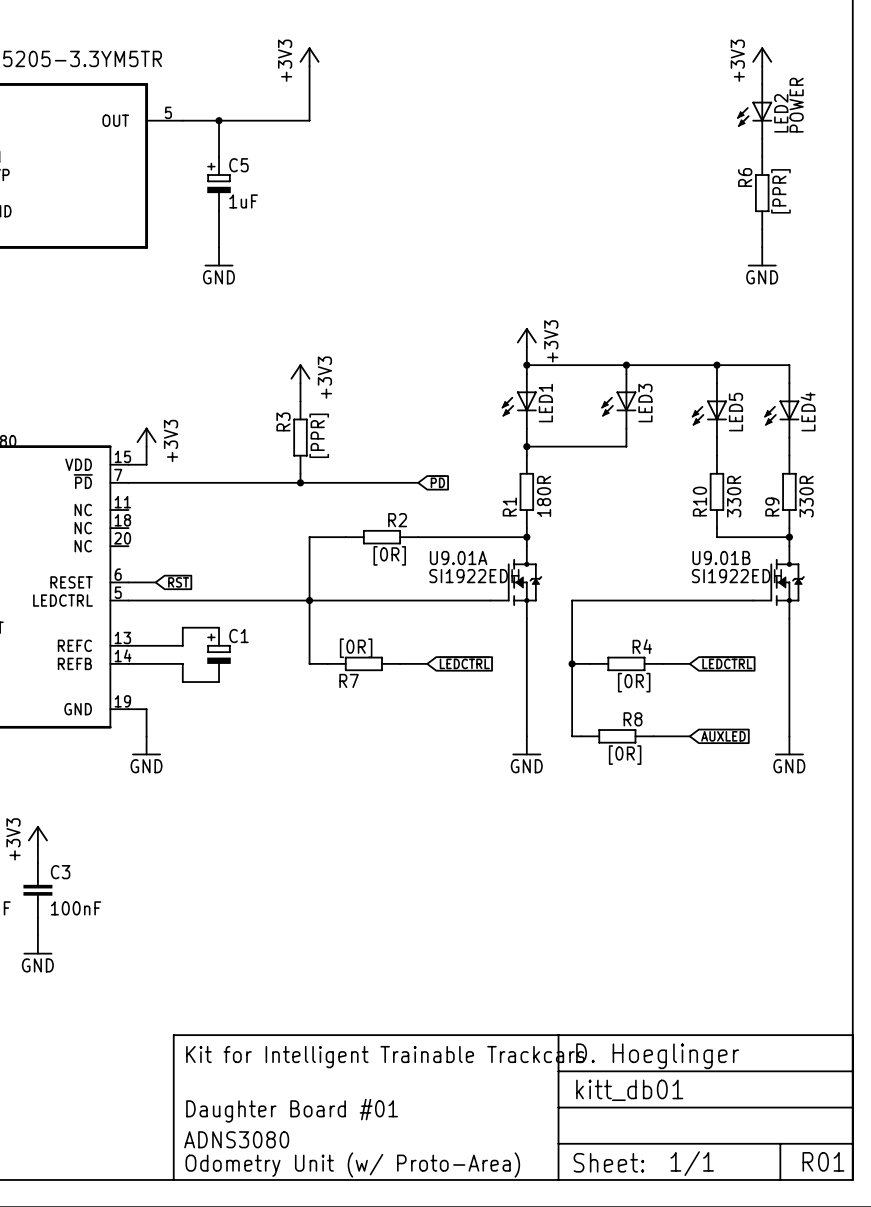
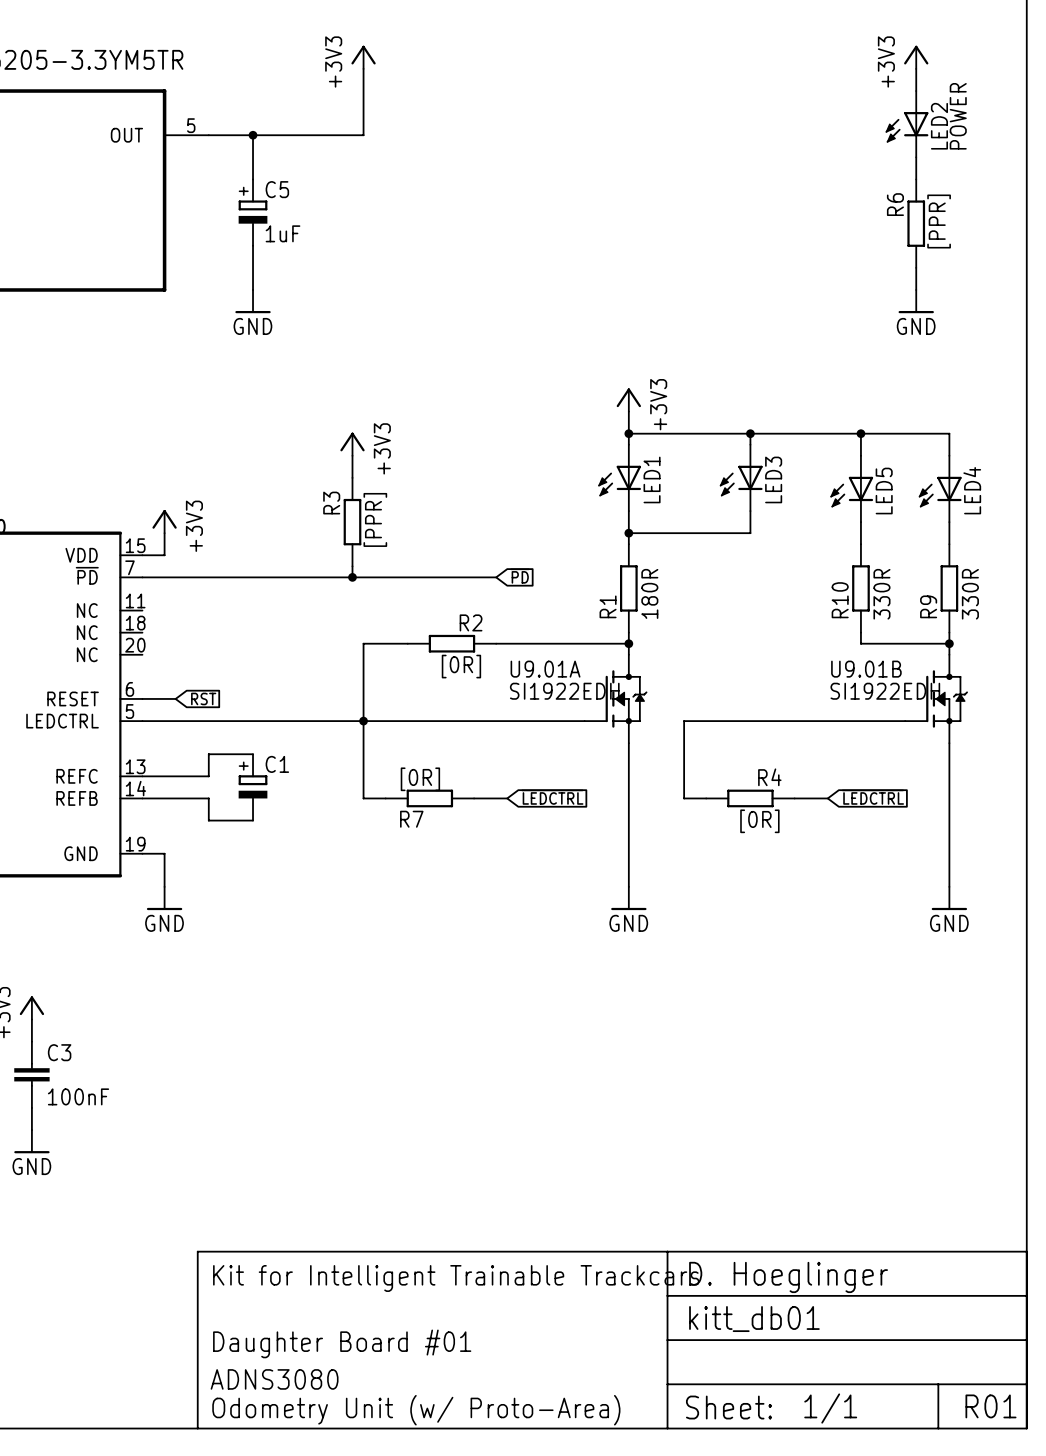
wire: (572, 663) (572, 736) (581, 736) -> none
junction: (572, 663) -> none
R8: [0R] (617, 736) -> none
wire: (653, 736) (689, 736) -> none
global label: AUXLED (723, 736) -> none

